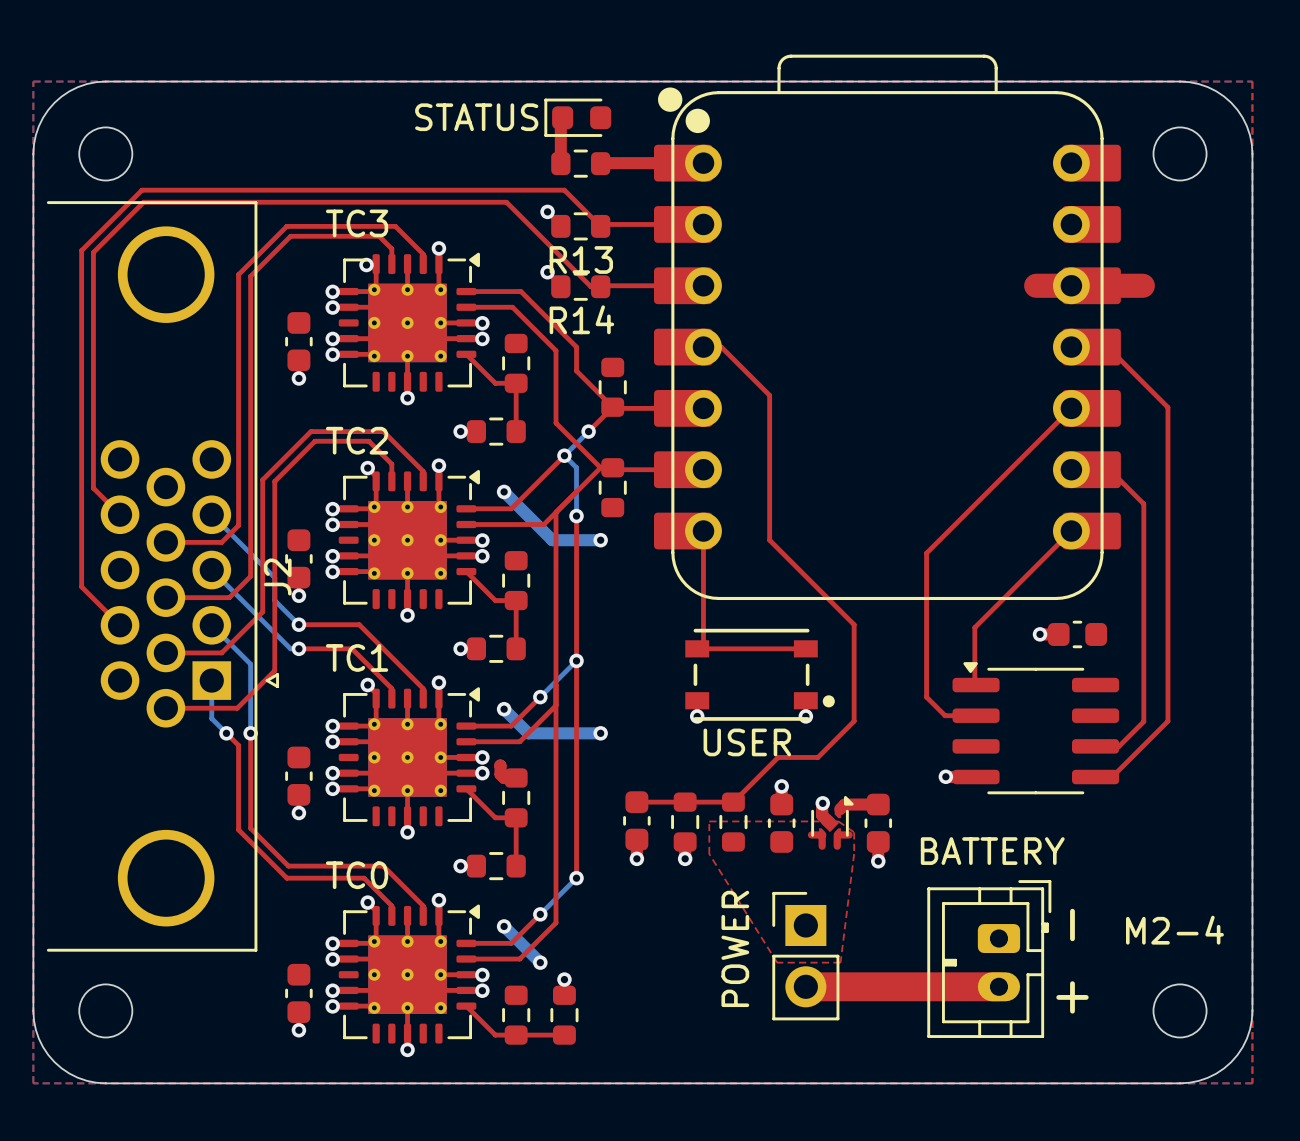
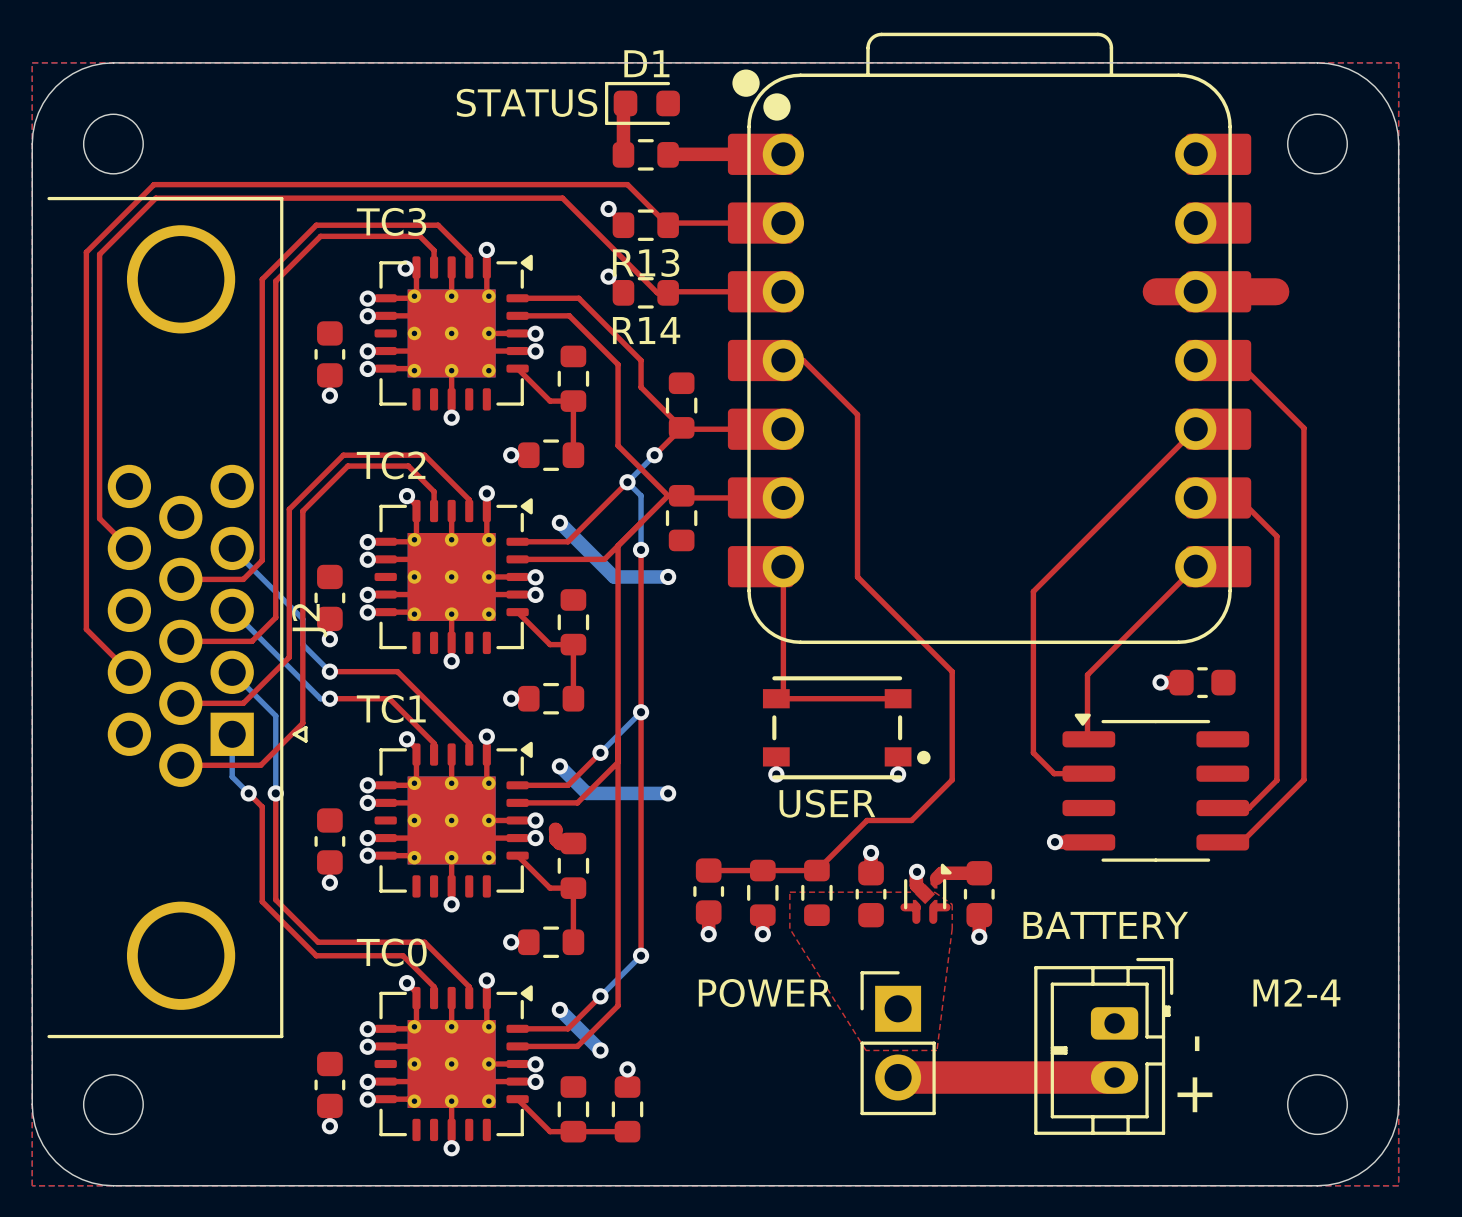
D1 name: none -> D1 (646, 63)
text position: M2-4 (1174, 930) -> M2-4 (1296, 992)
text rotation: 0° (735, 948) -> 90° clockwise (765, 993)

